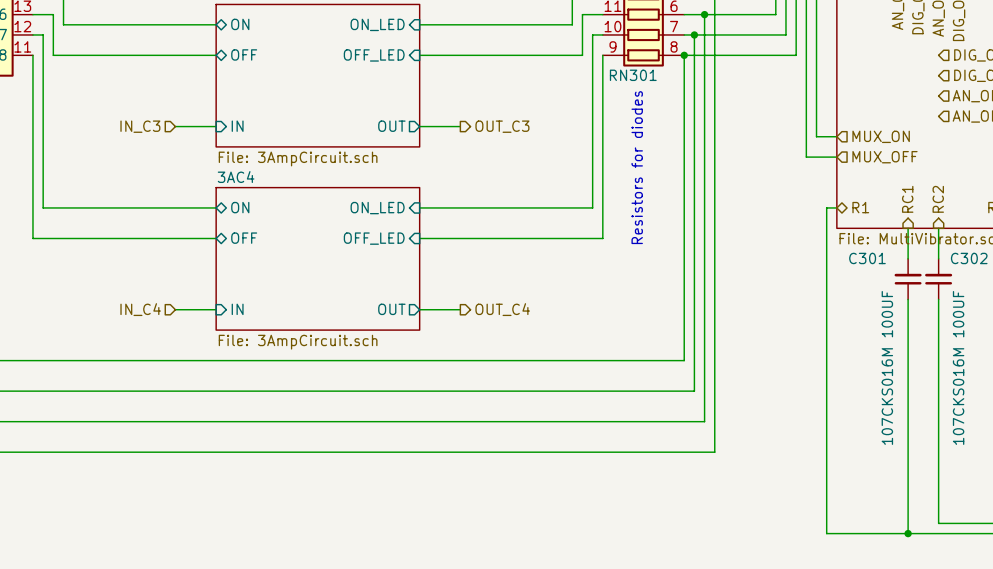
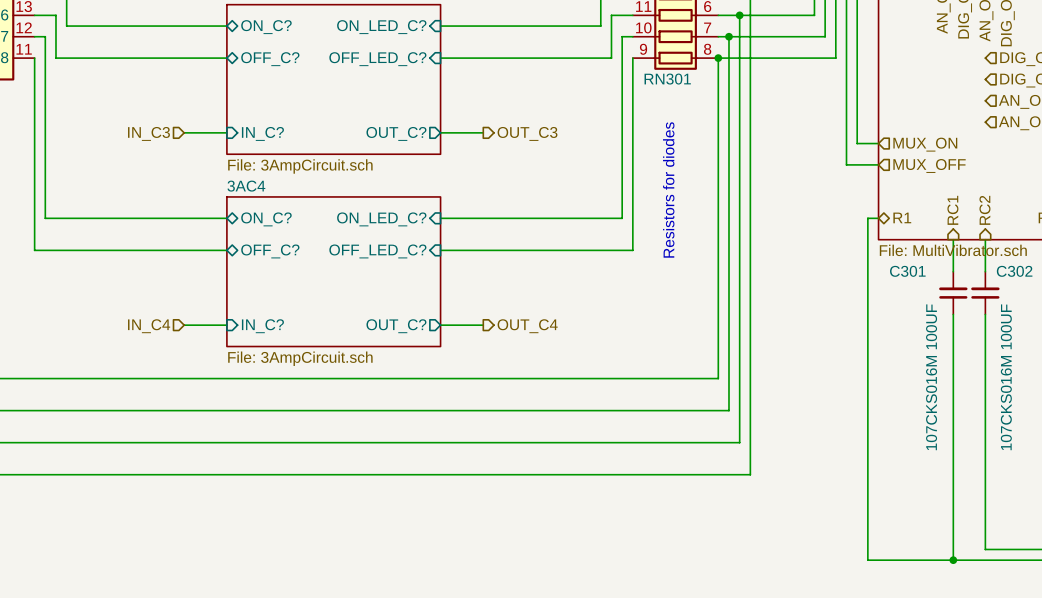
sheet pin: ON (240, 24) -> ON_C? (266, 27)
sheet pin: ON_LED (377, 24) -> ON_LED_C? (381, 27)
sheet pin: OFF (244, 54) -> OFF_C? (270, 59)
sheet pin: OFF_LED (374, 55) -> OFF_LED_C? (377, 59)
sheet pin: IN (237, 126) -> IN_C? (262, 133)
sheet pin: OUT (391, 126) -> OUT_C? (396, 133)
sheet pin: ON (240, 207) -> ON_C? (266, 219)
sheet pin: ON_LED (377, 208) -> ON_LED_C? (381, 219)
sheet pin: OFF (244, 238) -> OFF_C? (270, 251)
sheet pin: OFF_LED (374, 238) -> OFF_LED_C? (377, 251)
sheet pin: IN (237, 309) -> IN_C? (262, 326)
sheet pin: OUT (391, 309) -> OUT_C? (396, 326)

